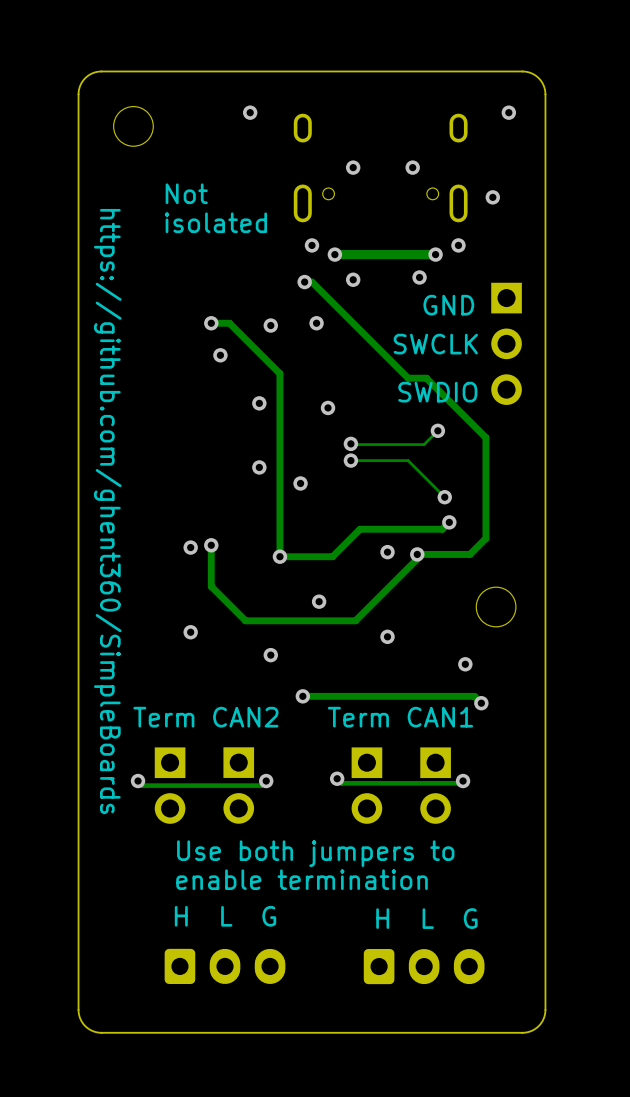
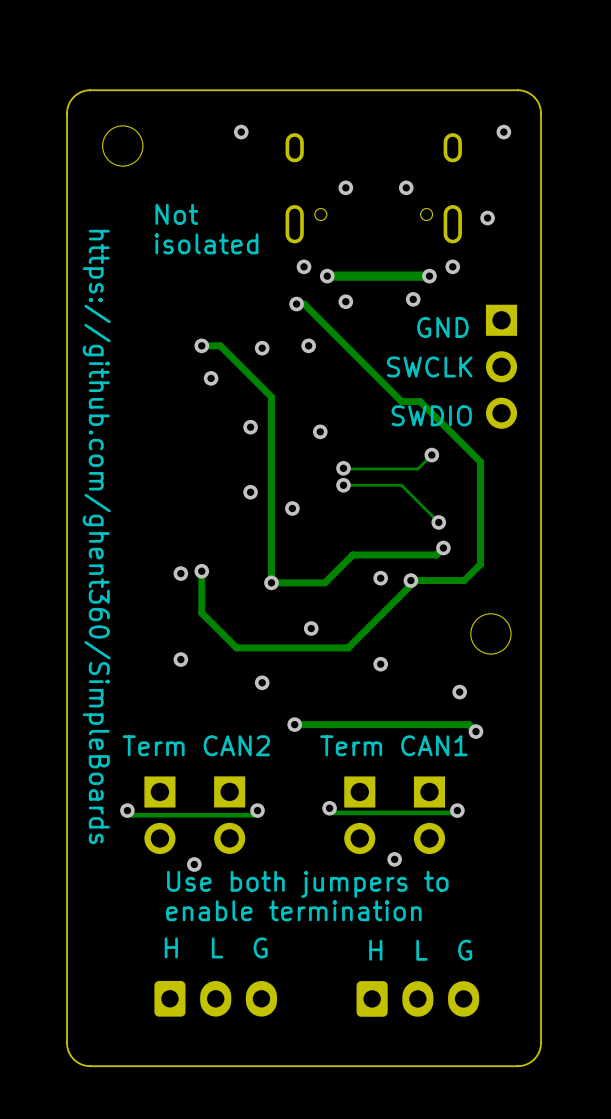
via: none -> (394, 859)
via: none -> (194, 864)

